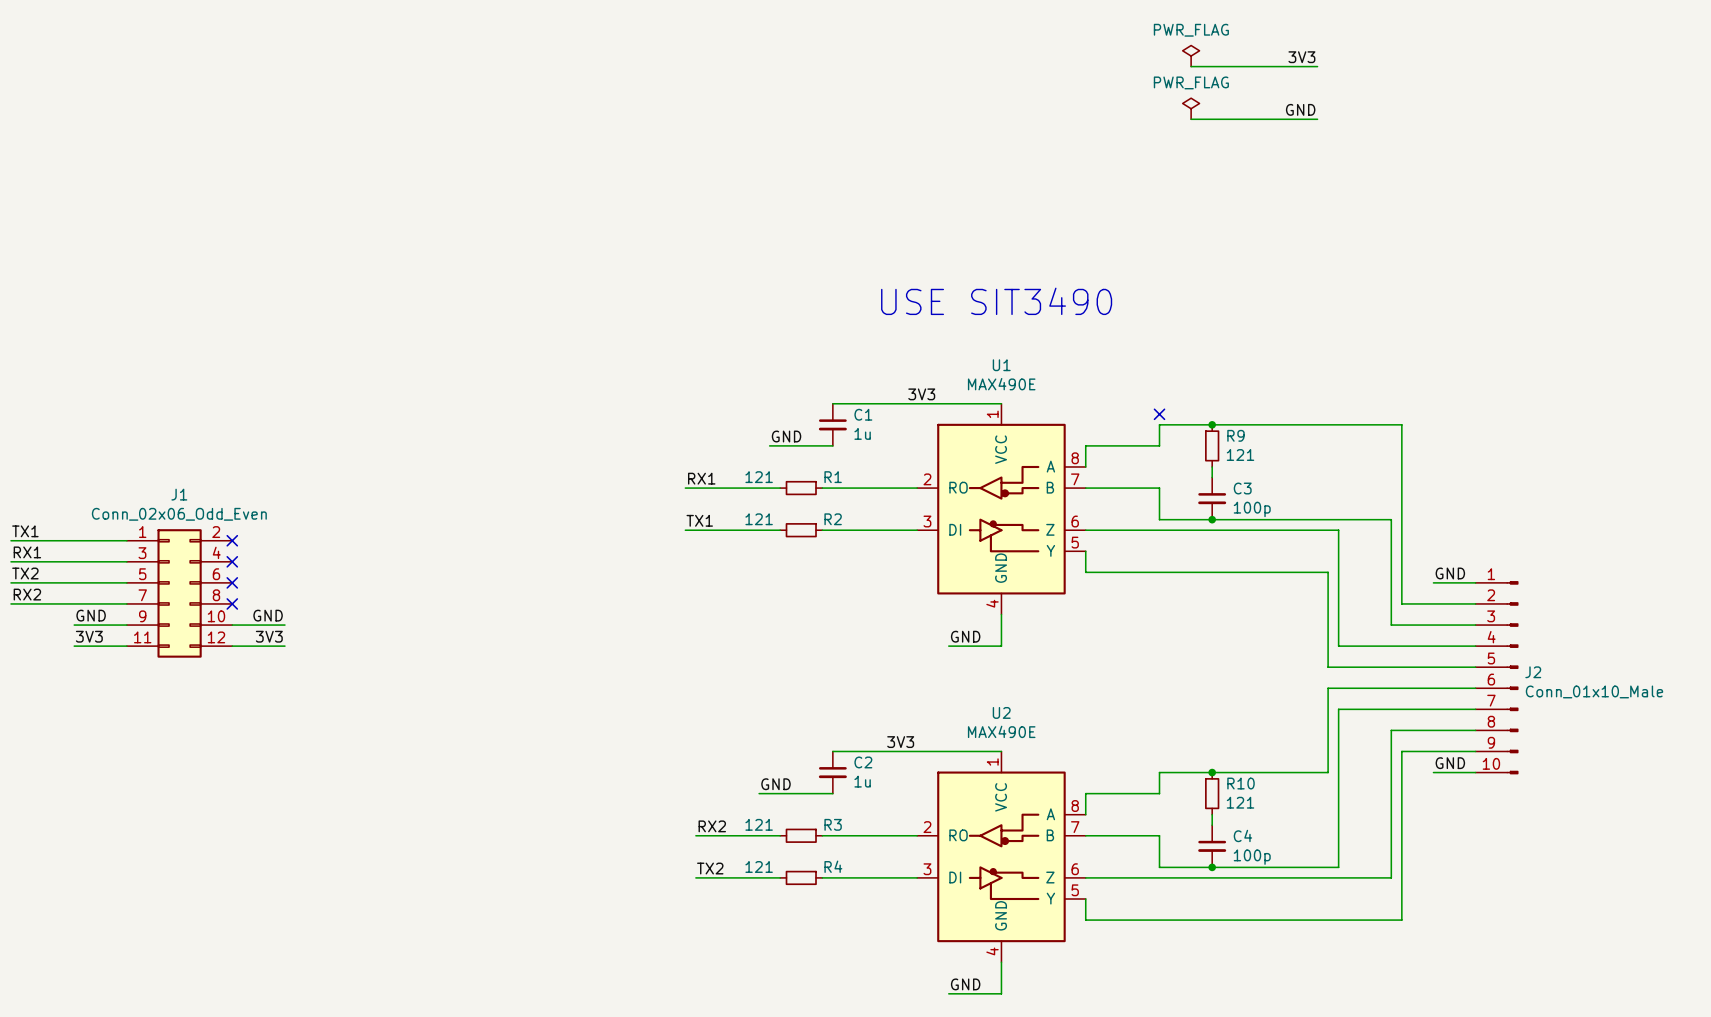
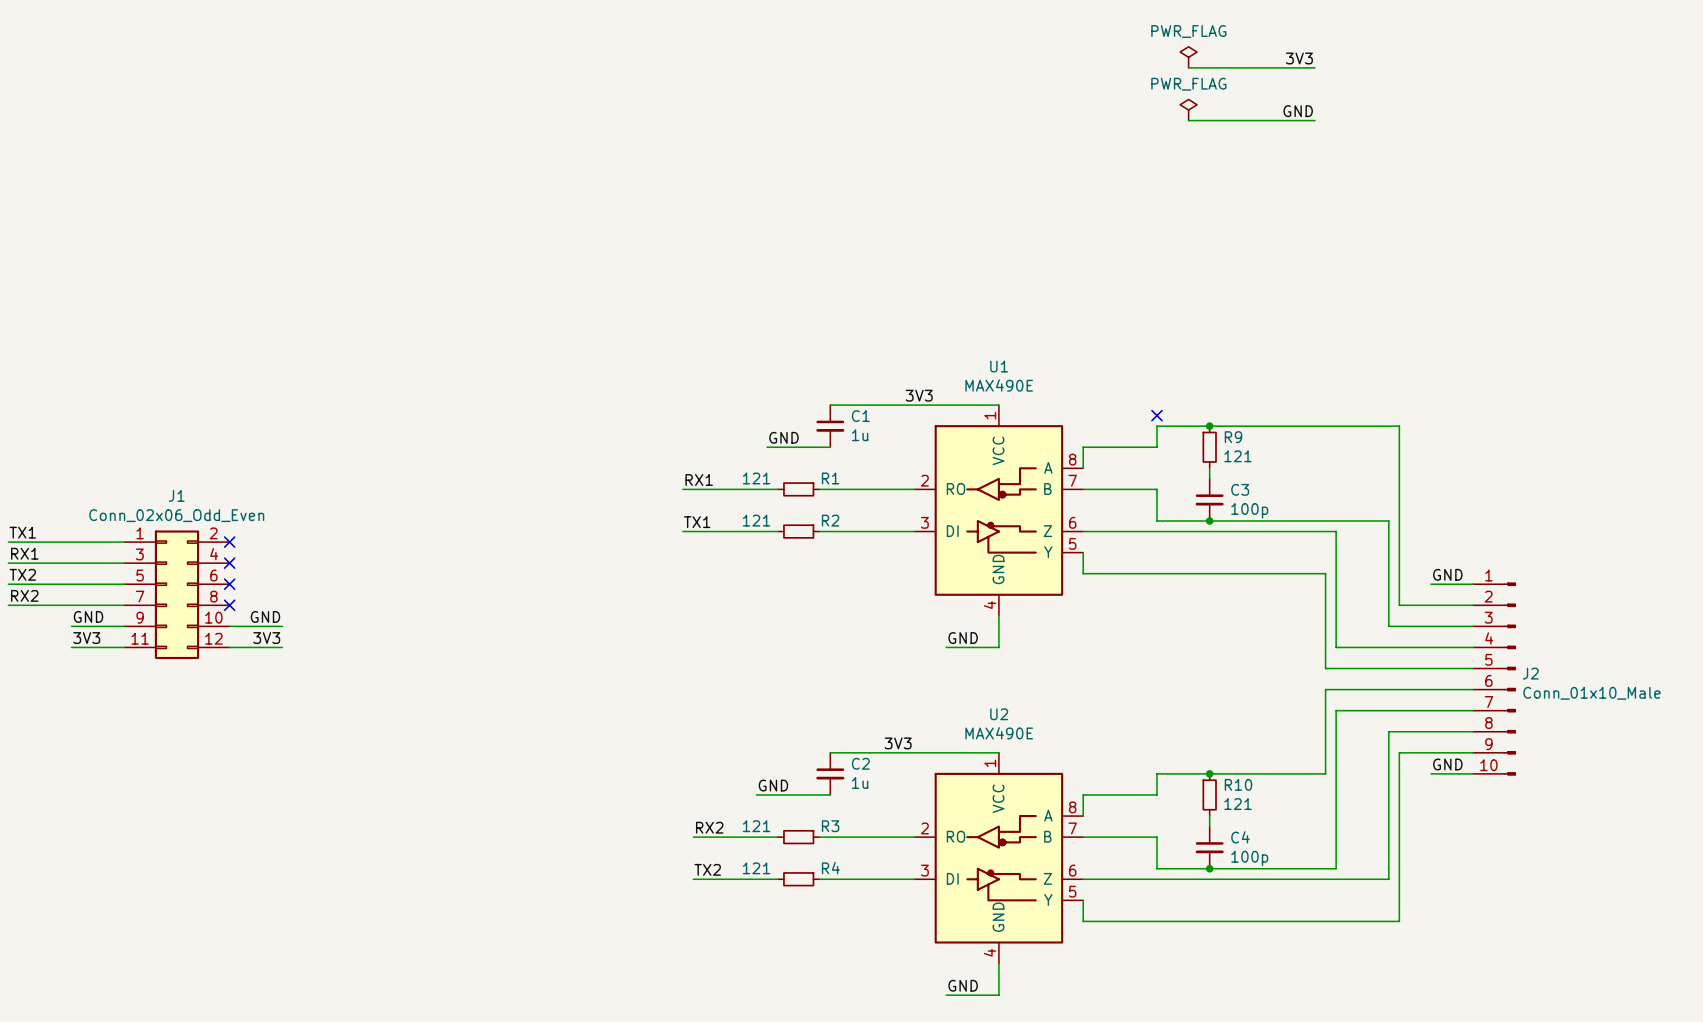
text: USE SIT3490 (996, 301) -> none

